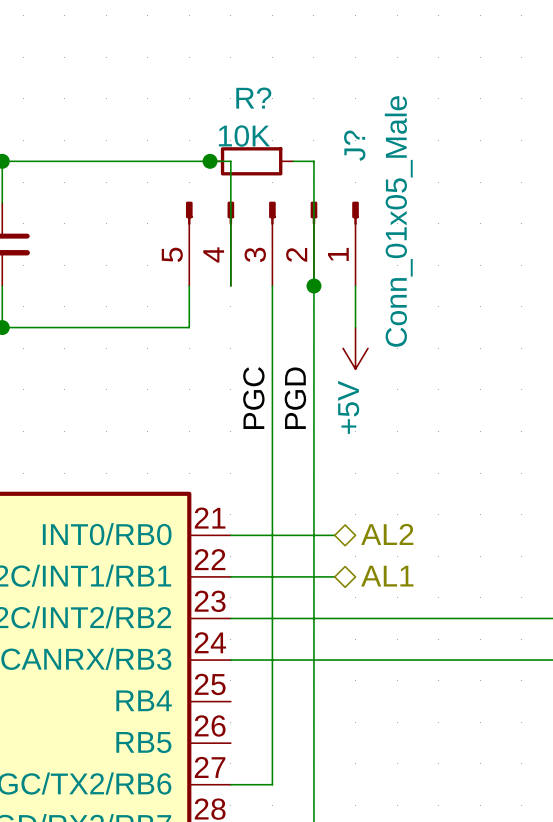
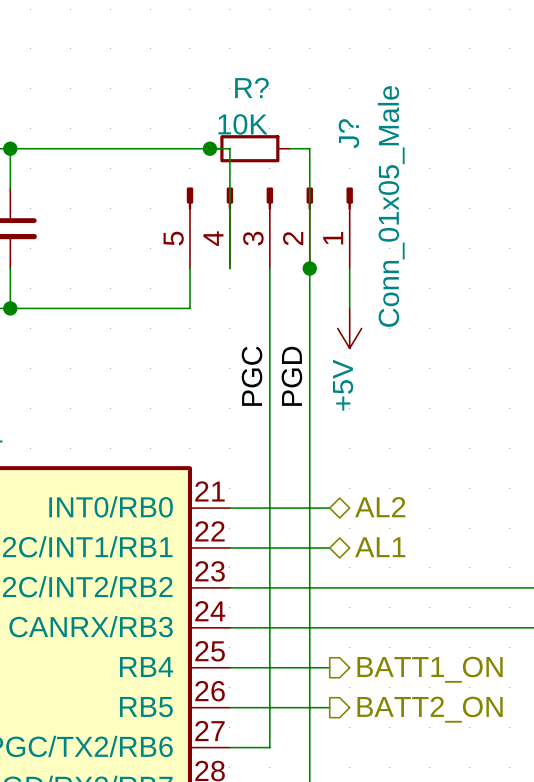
wire: none -> (229, 667) (329, 667)
hierarchical label: none -> BATT1_ON (430, 669)
wire: none -> (229, 707) (329, 707)
hierarchical label: none -> BATT2_ON (430, 709)

